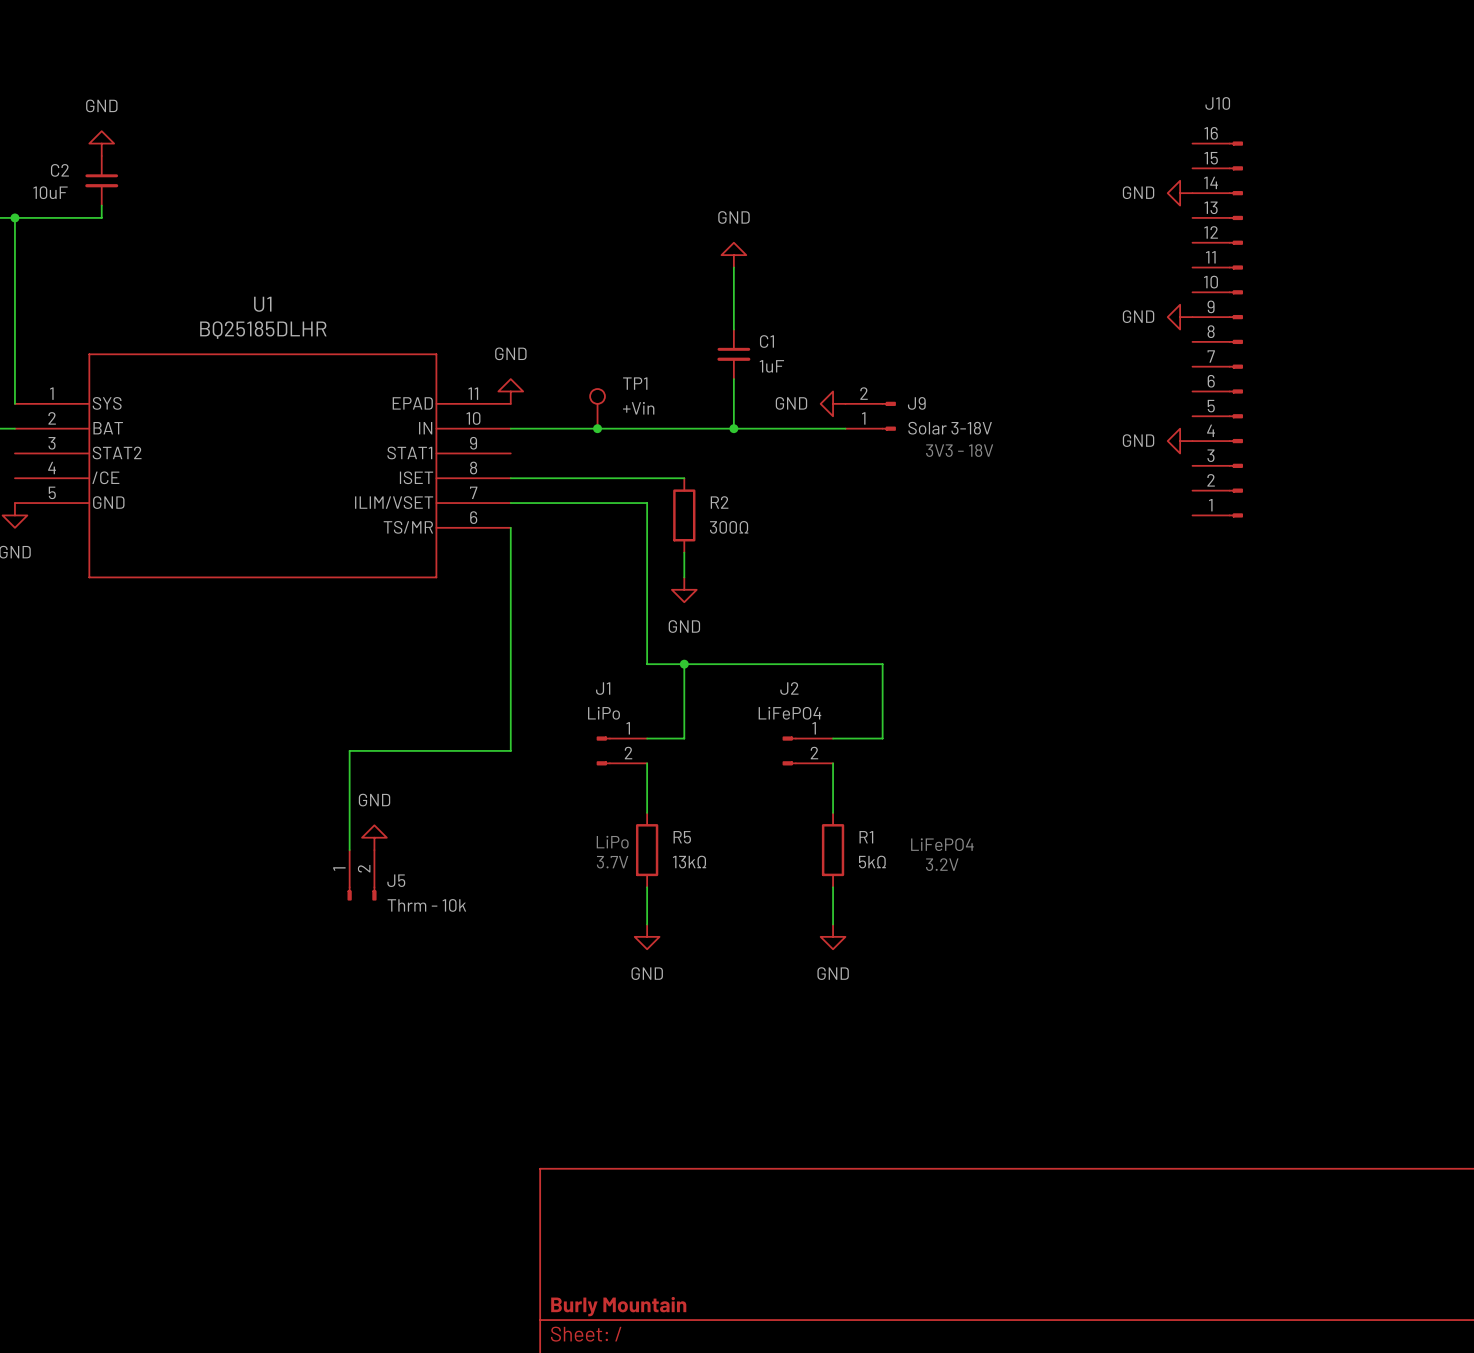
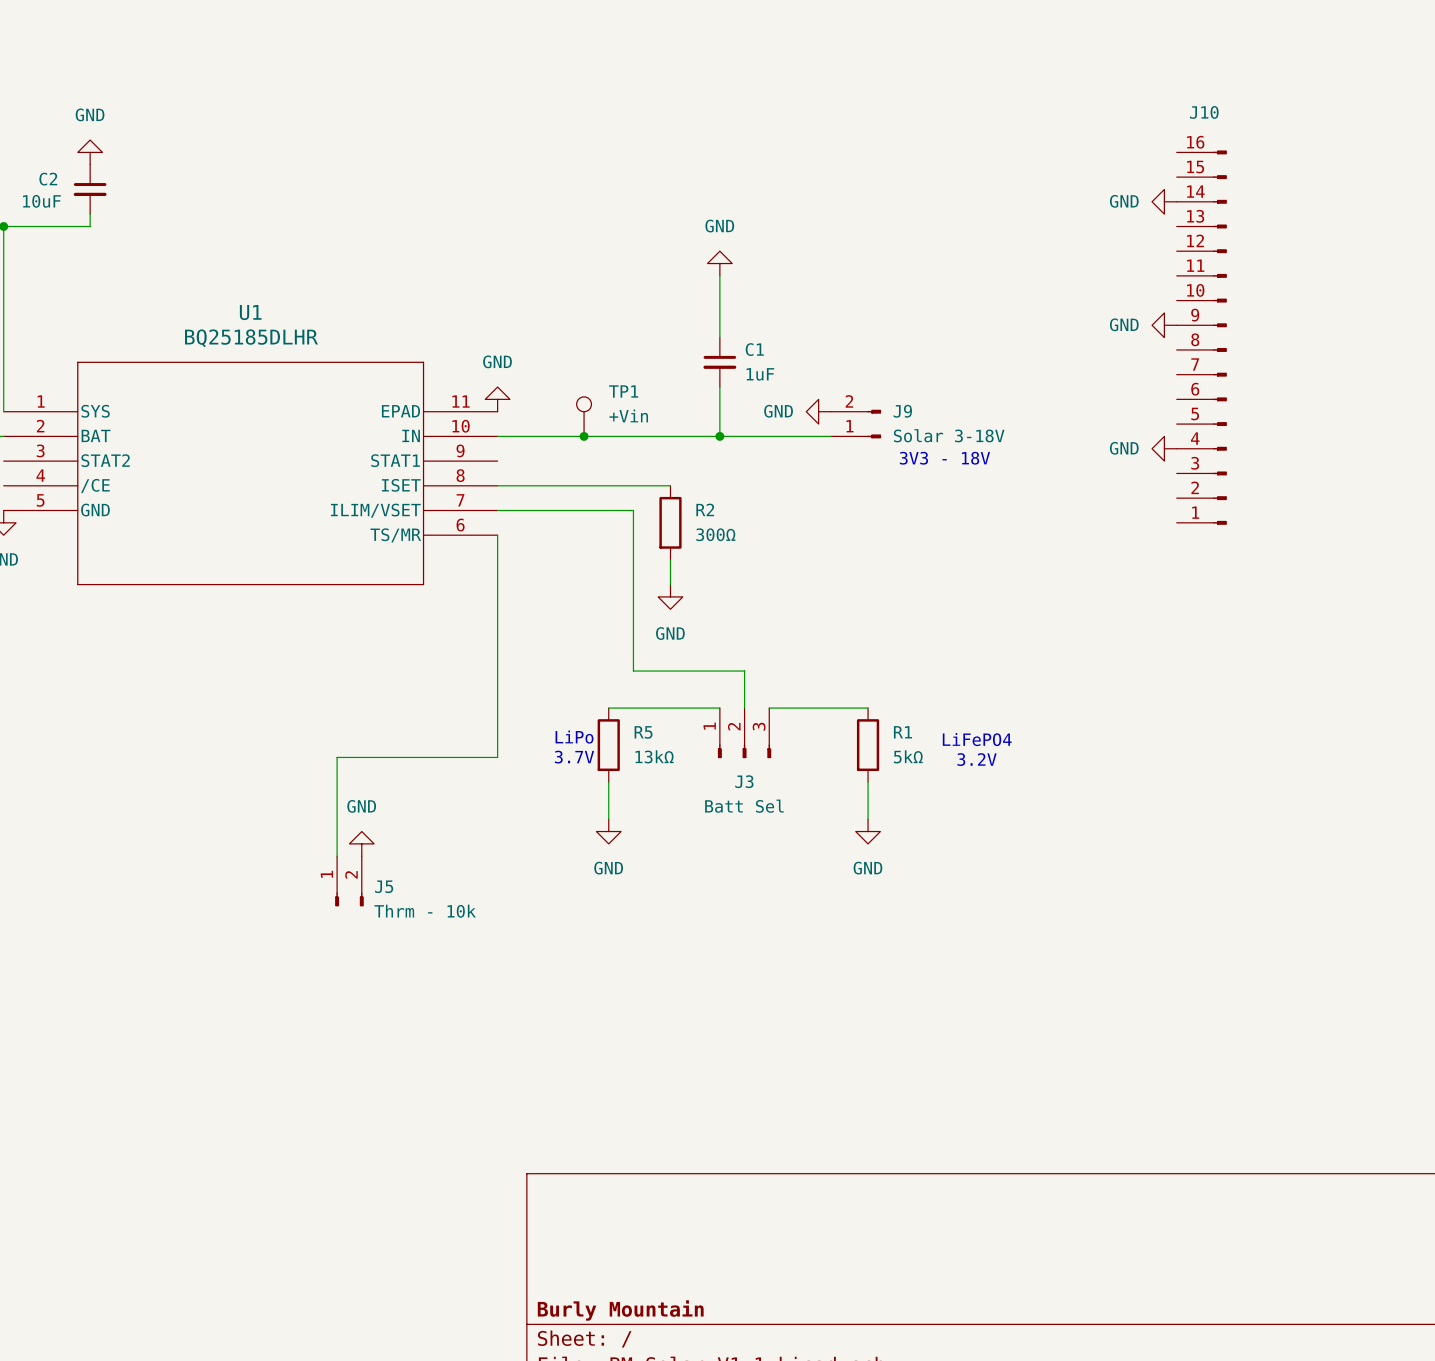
wire: (684, 664) (684, 738) (647, 738) -> none
junction: (684, 664) -> none
wire: (758, 664) (882, 664) (882, 738) (833, 738) -> (744, 671) (744, 708)
wire: none -> (608, 708) (719, 708)
wire: none -> (769, 708) (868, 708)
J3: none -> Batt Sel (744, 733)
J1: LiPo (621, 750) -> none
J2: LiFePO4 (807, 750) -> none
wire: (647, 763) (647, 812) -> none
wire: (833, 763) (833, 812) -> none
power symbol: none -> GND (868, 831)
text position: LiPo (612, 842) -> LiPo (574, 737)
text position: LiFePO4 (942, 844) -> LiFePO4 (977, 739)
R5 position: (647, 850) -> (608, 745)
R1 position: (833, 850) -> (868, 745)
text position: 3.7V (612, 862) -> 3.7V (574, 757)
text position: 3.2V (942, 864) -> 3.2V (977, 759)
wire: (647, 887) (647, 924) -> (608, 782) (608, 819)
wire: (833, 887) (833, 924) -> (868, 782) (868, 819)
power symbol position: GND (647, 936) -> GND (608, 831)
power symbol: GND (833, 936) -> none

